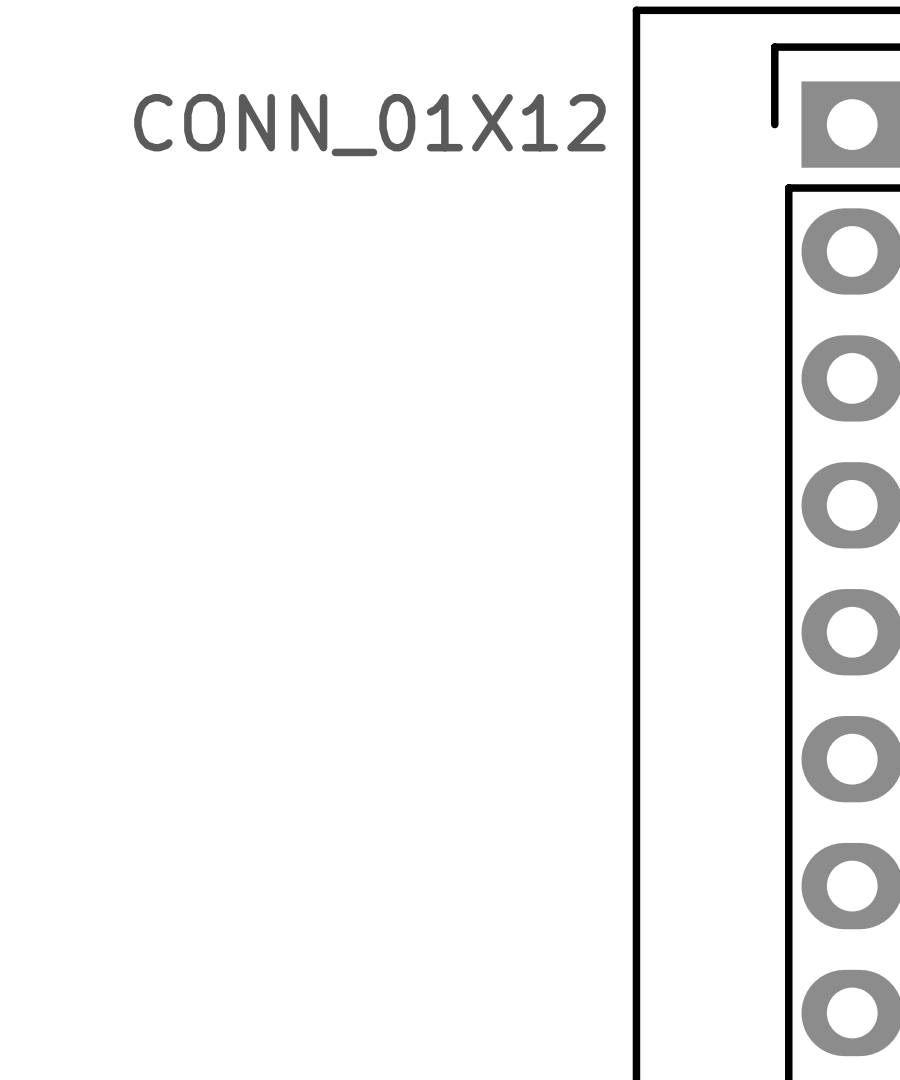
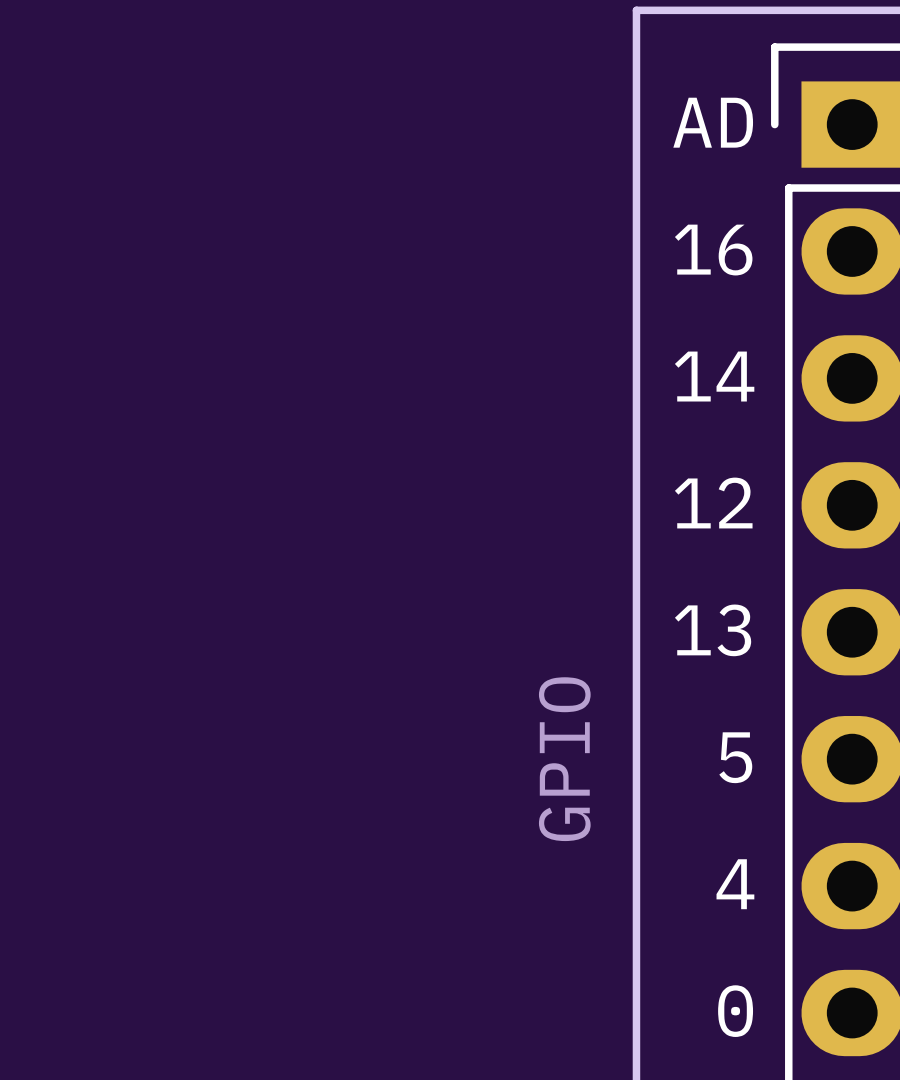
text: none -> AD (713, 122)
part value: CONN_01X12 (369, 125) -> GPIO (564, 759)
text: none -> 16 (713, 250)
text: none -> 14 (714, 376)
text: none -> 12 (713, 503)
text: none -> 13 (713, 630)
text: none -> 5 (735, 757)
text: none -> 4 (735, 884)
text: none -> 0 (735, 1011)

